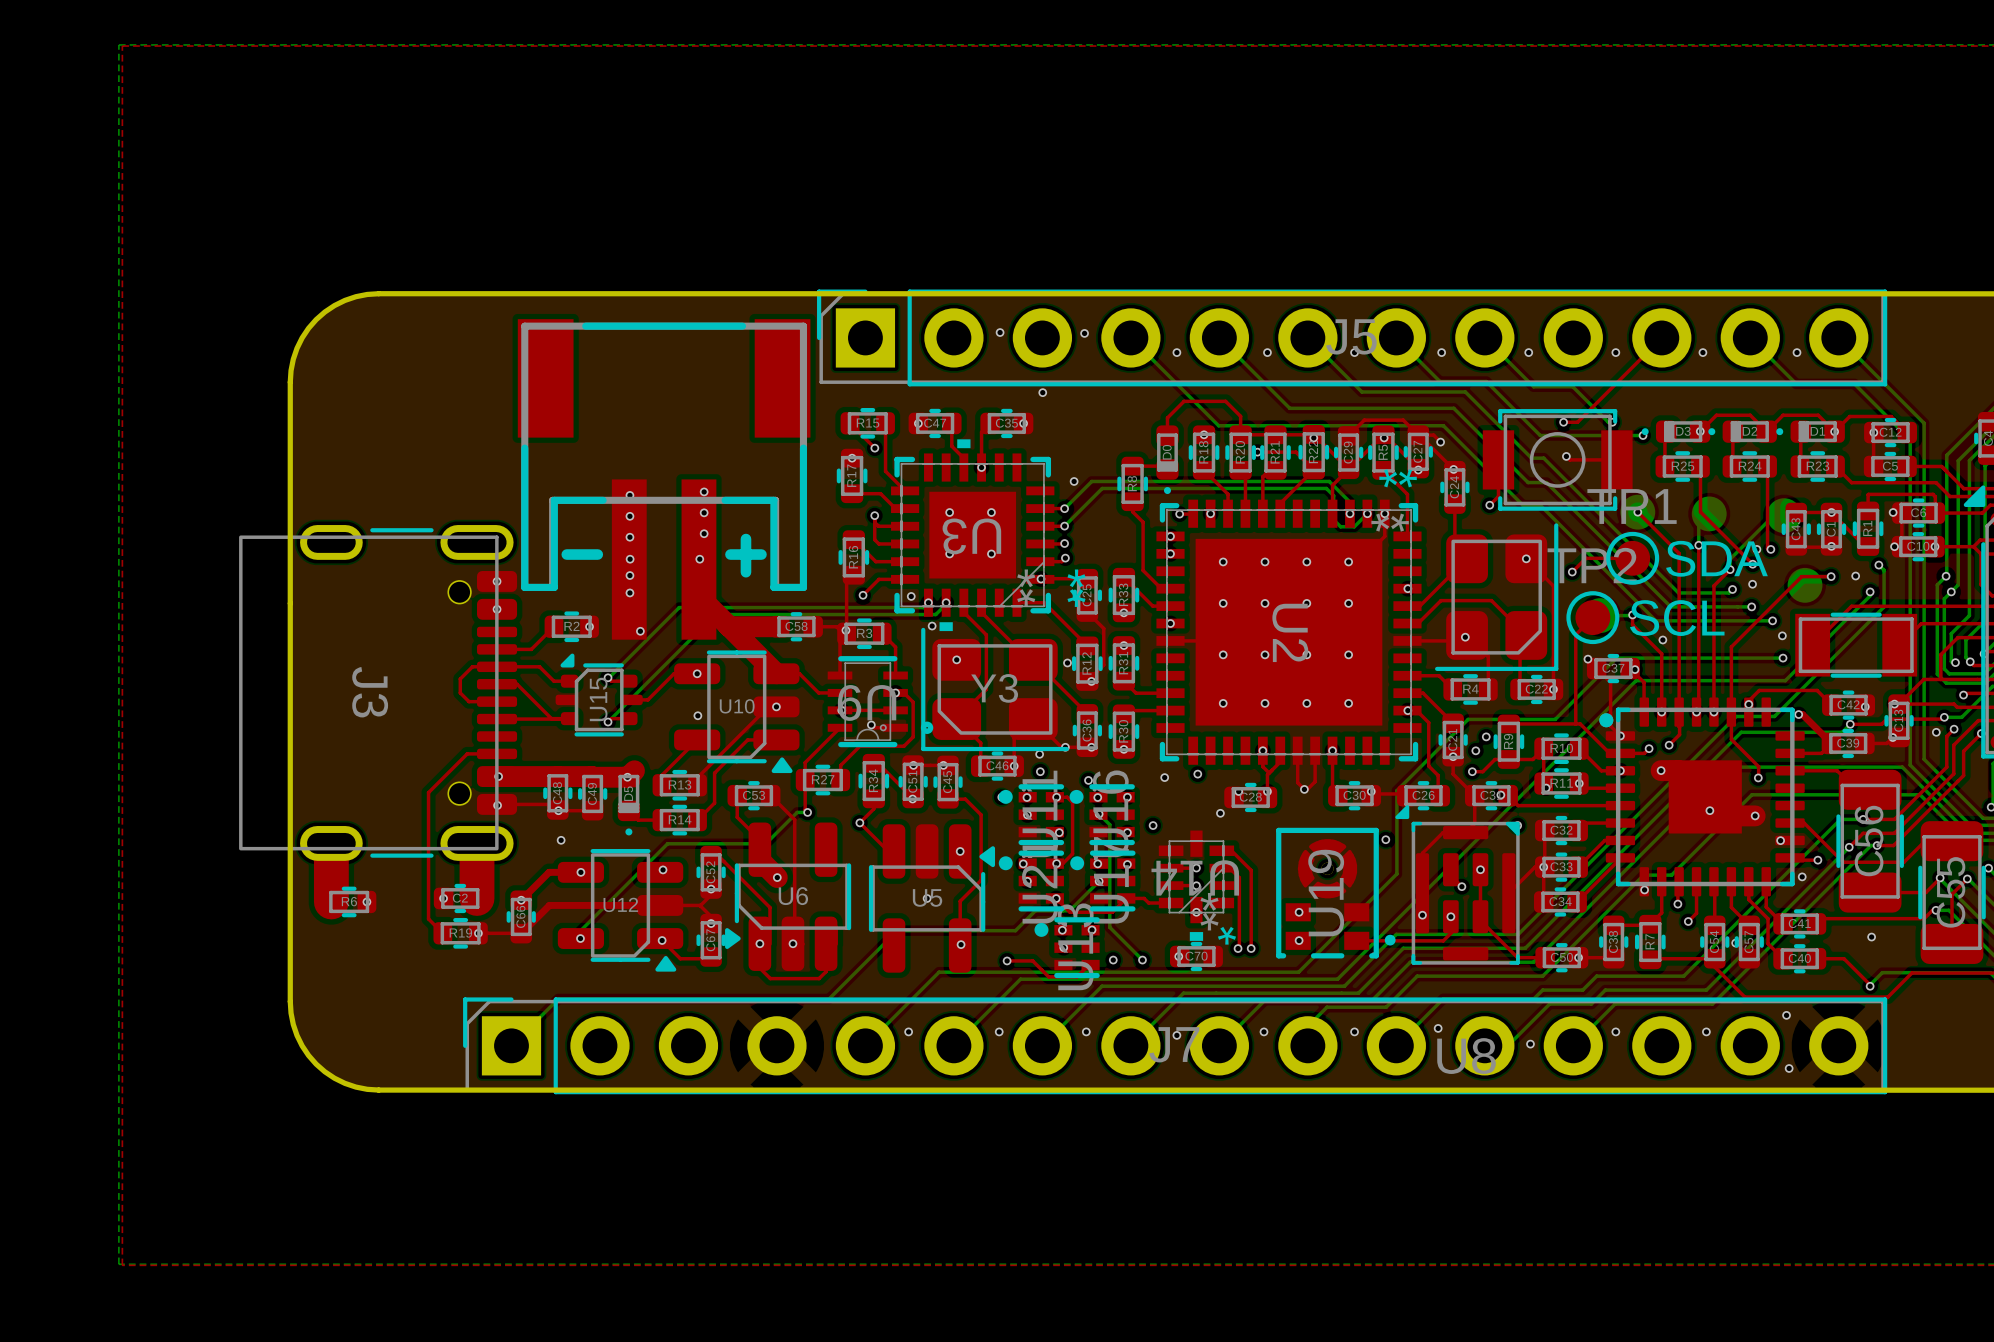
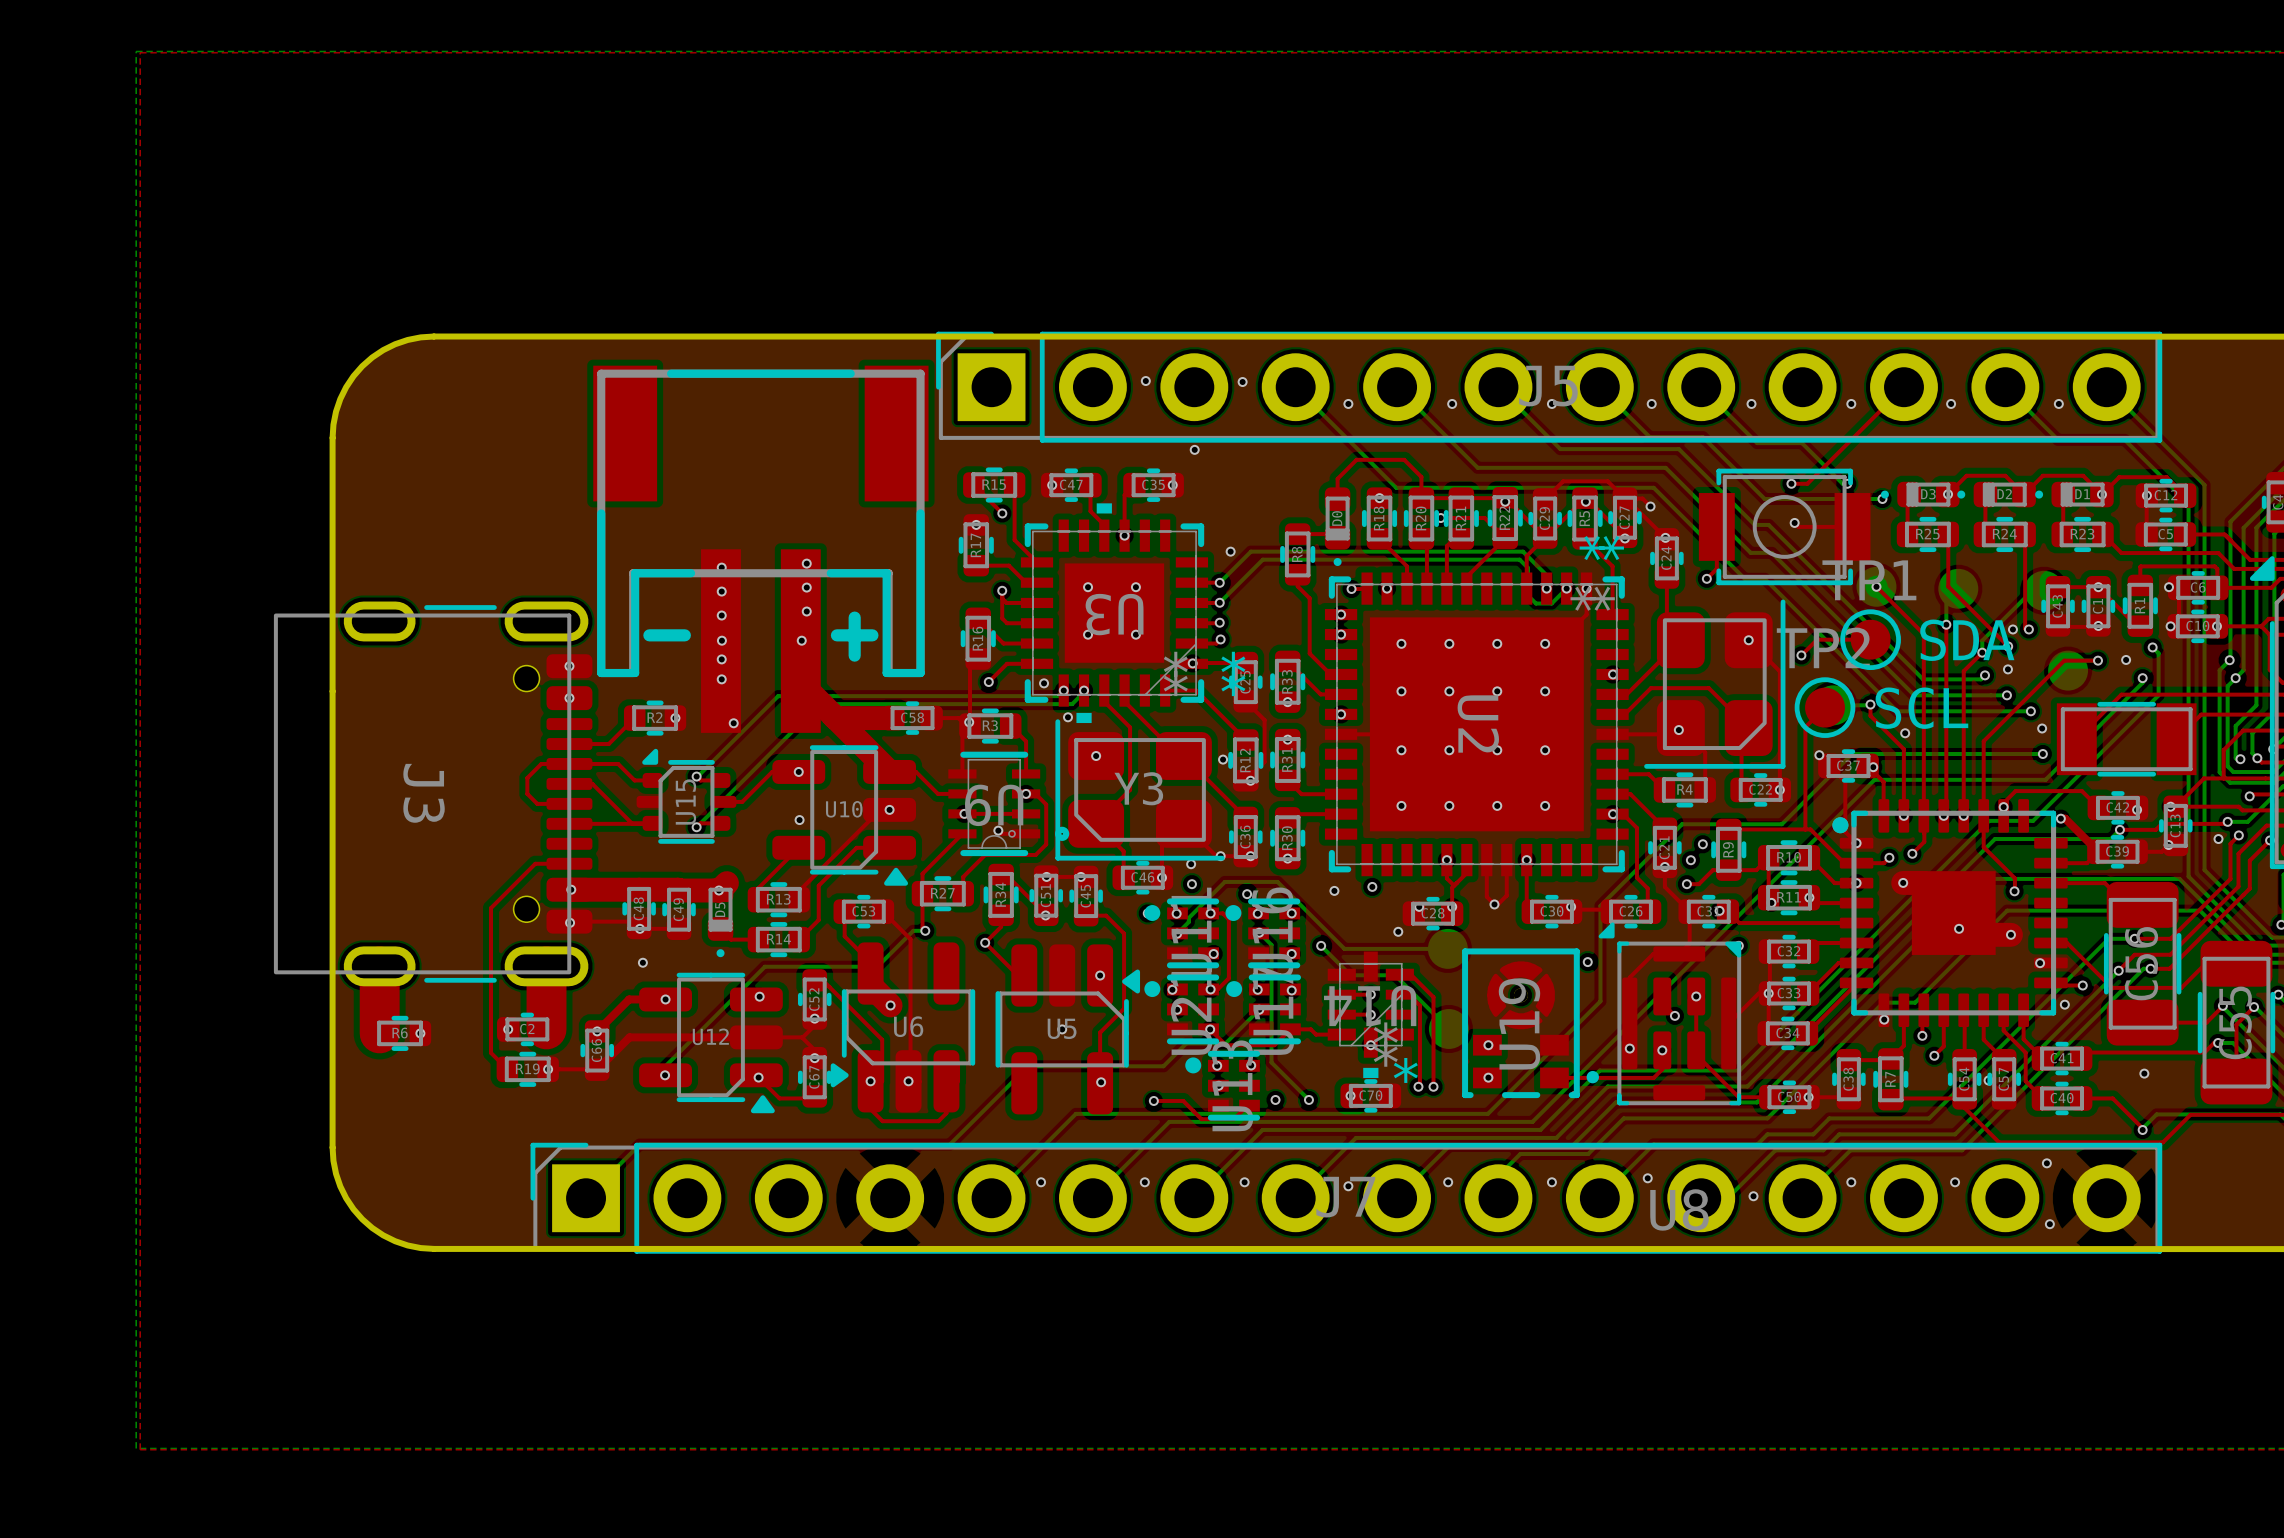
bottom track: none -> (1177, 933) (1188, 922) (1188, 917) (1224, 881) (1277, 881) (1344, 948) (1447, 948)
bottom track: none -> (1321, 945) (1350, 975) (1395, 975) (1448, 1028)
part: none -> (1447, 948)
part: none -> (1448, 1028)

